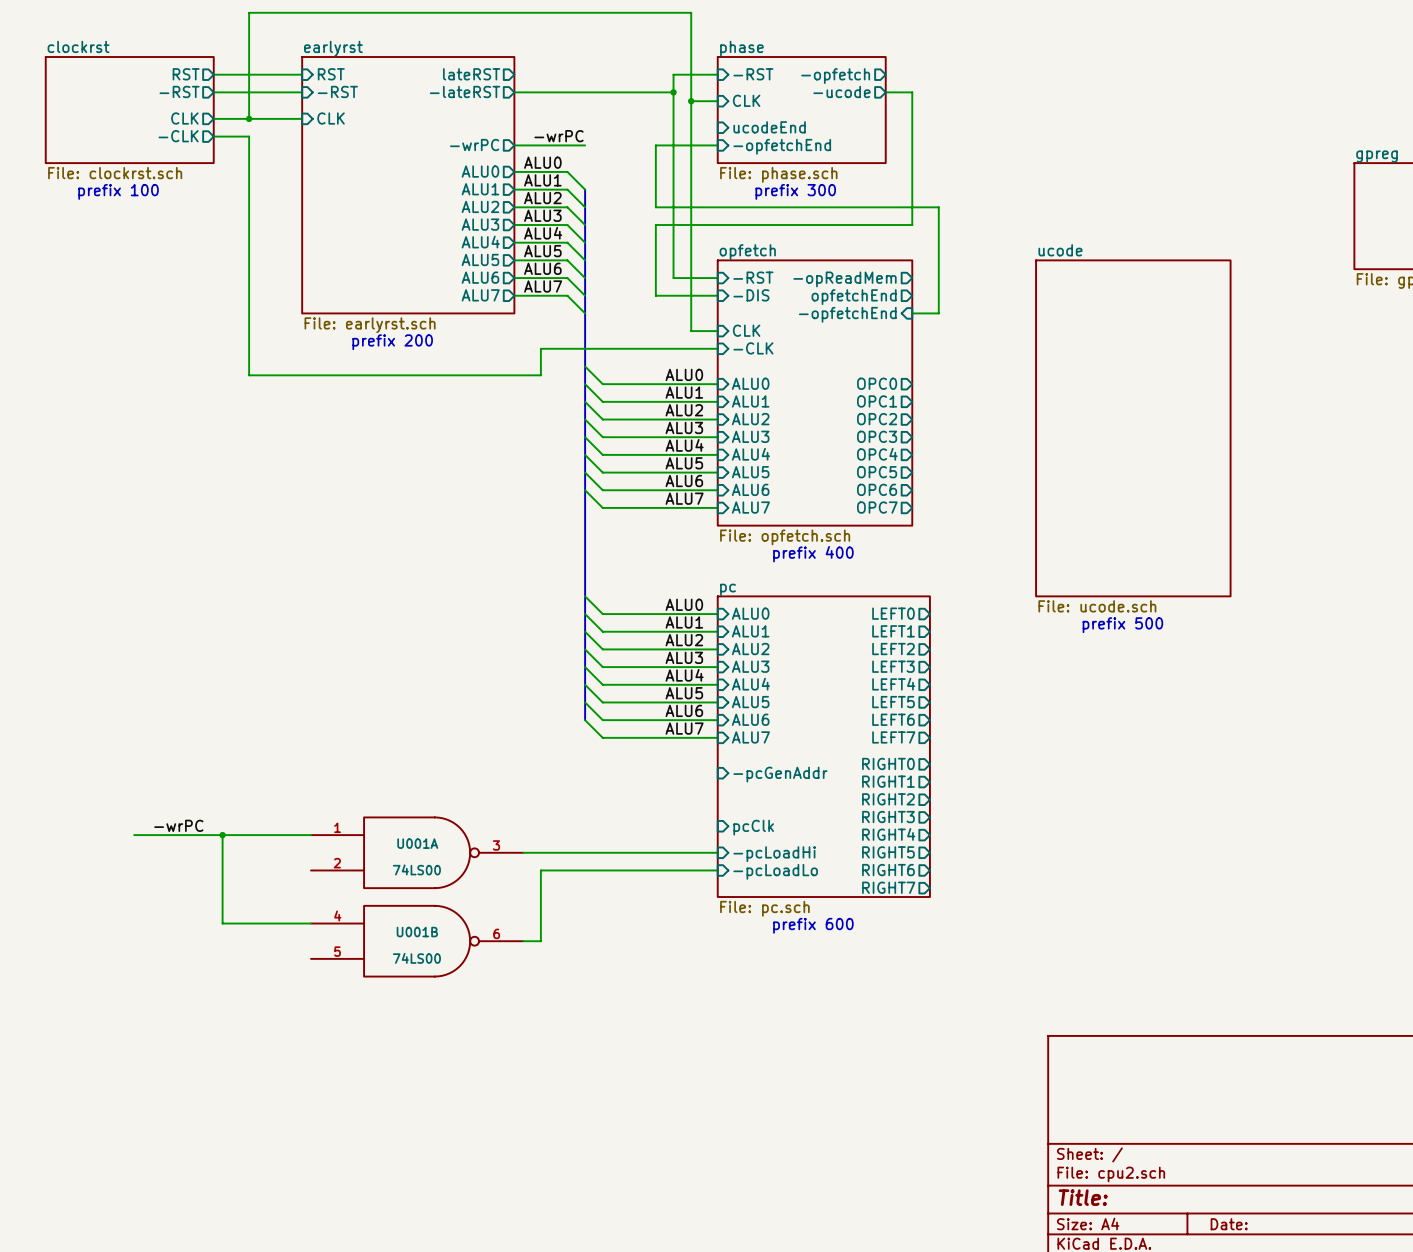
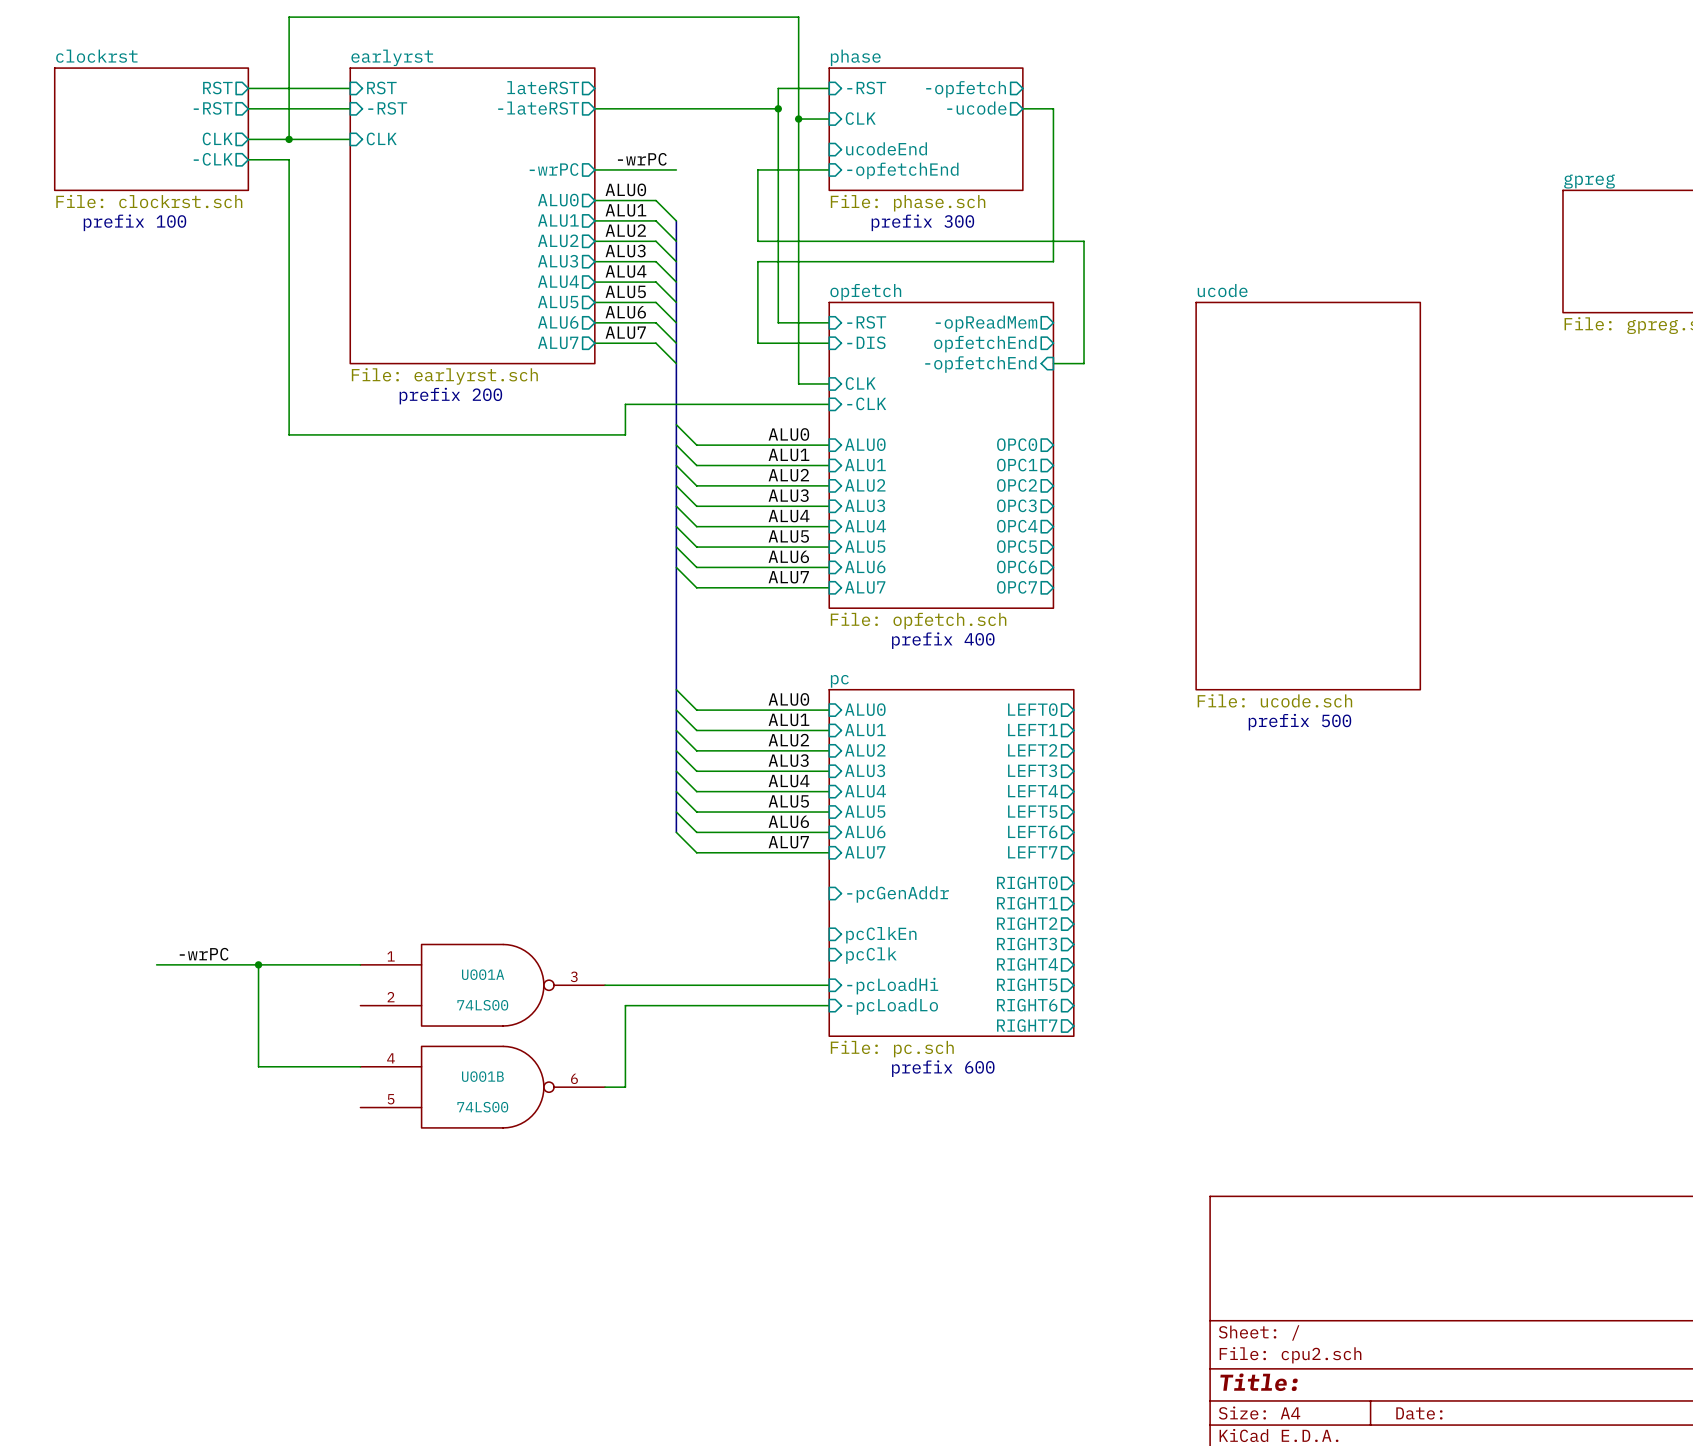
sheet pin: none -> pcClkEn (881, 935)

